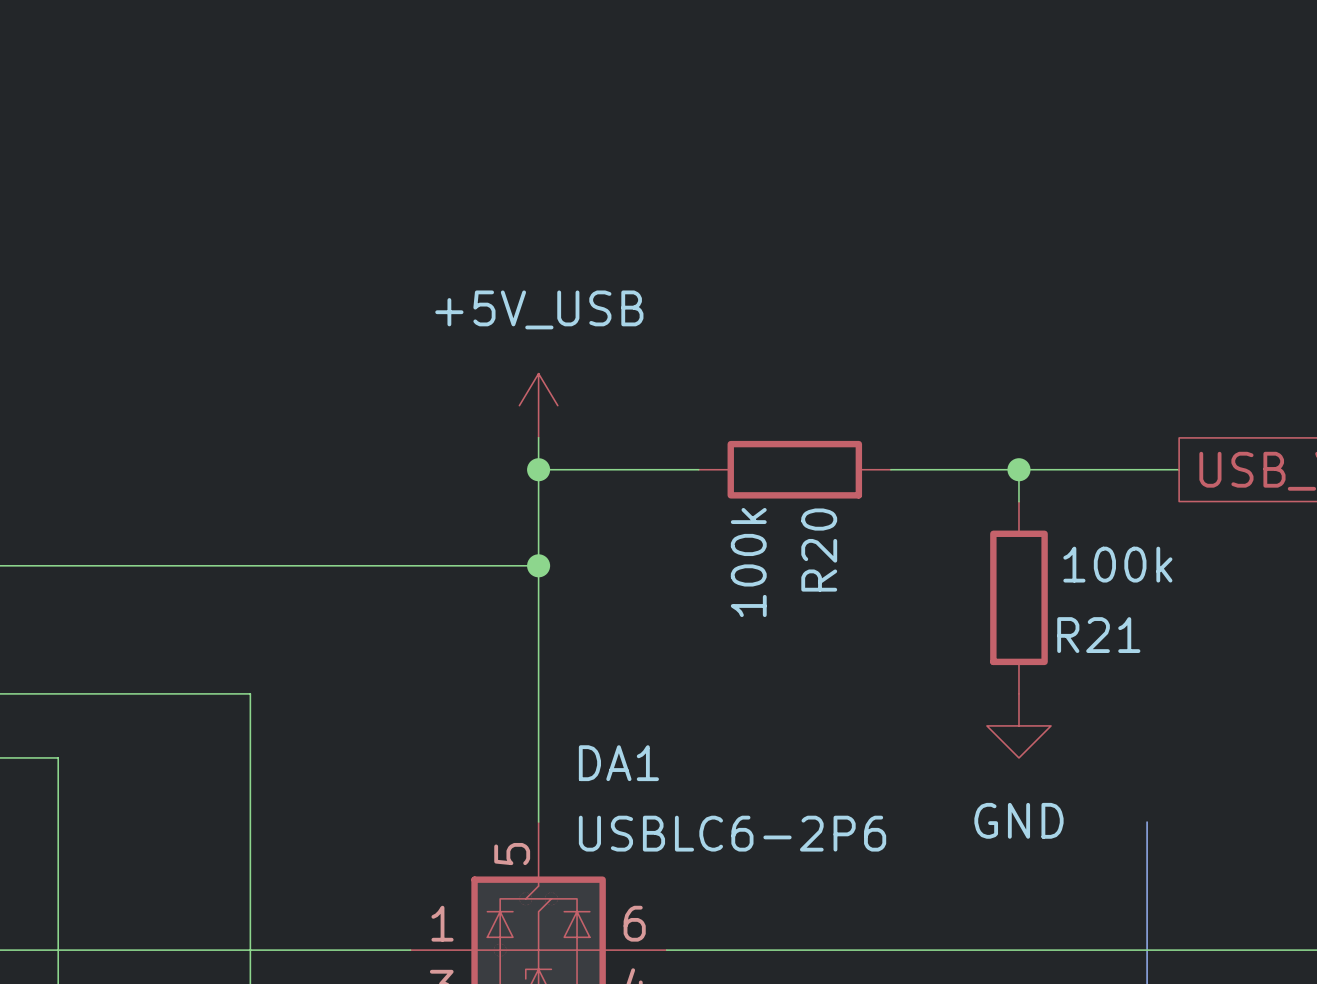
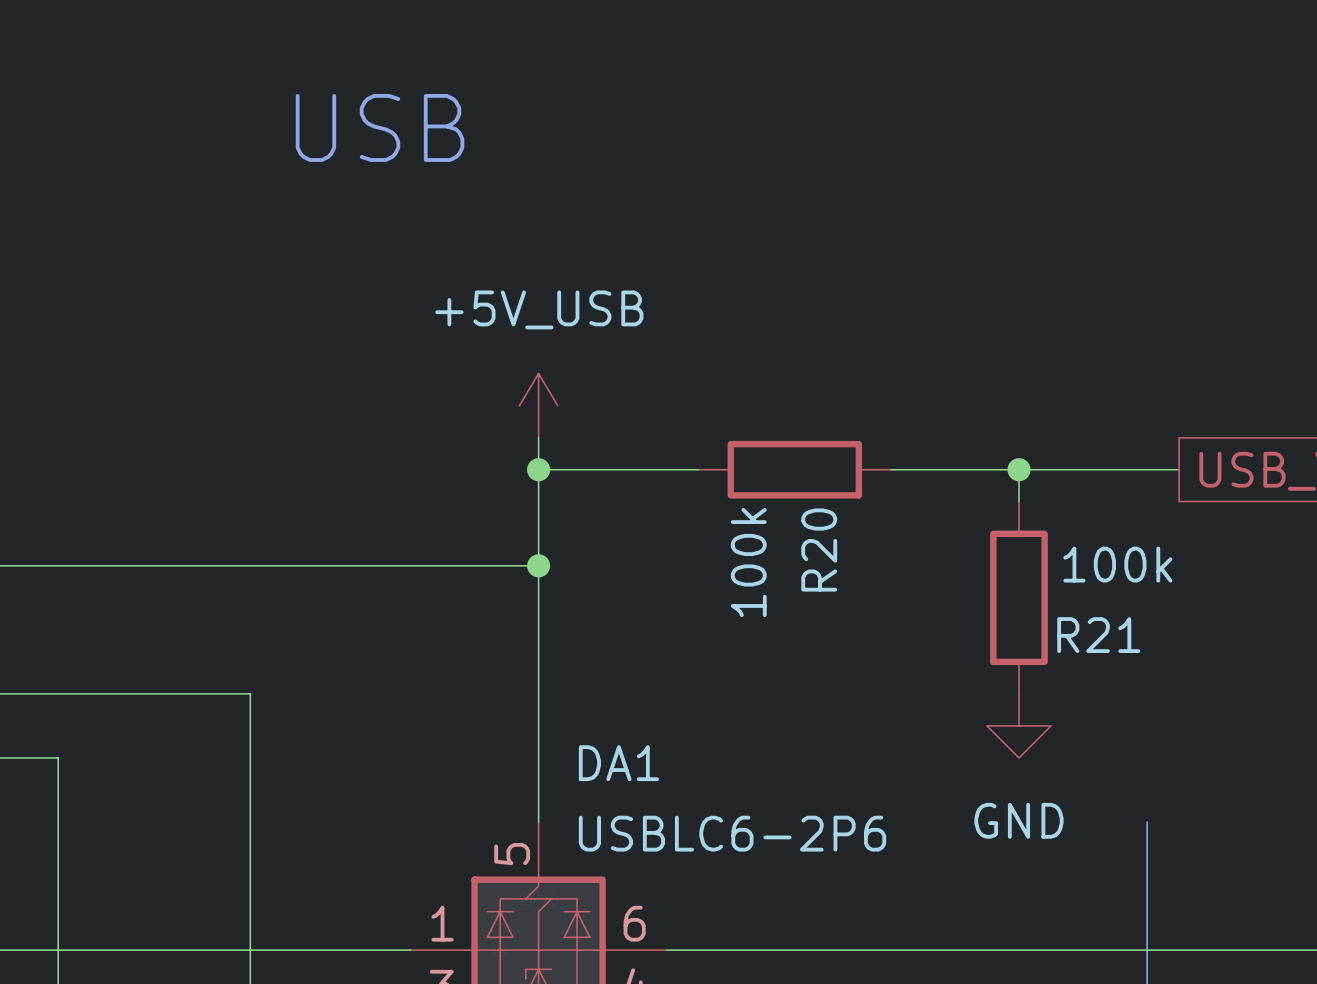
text: none -> USB (379, 127)

